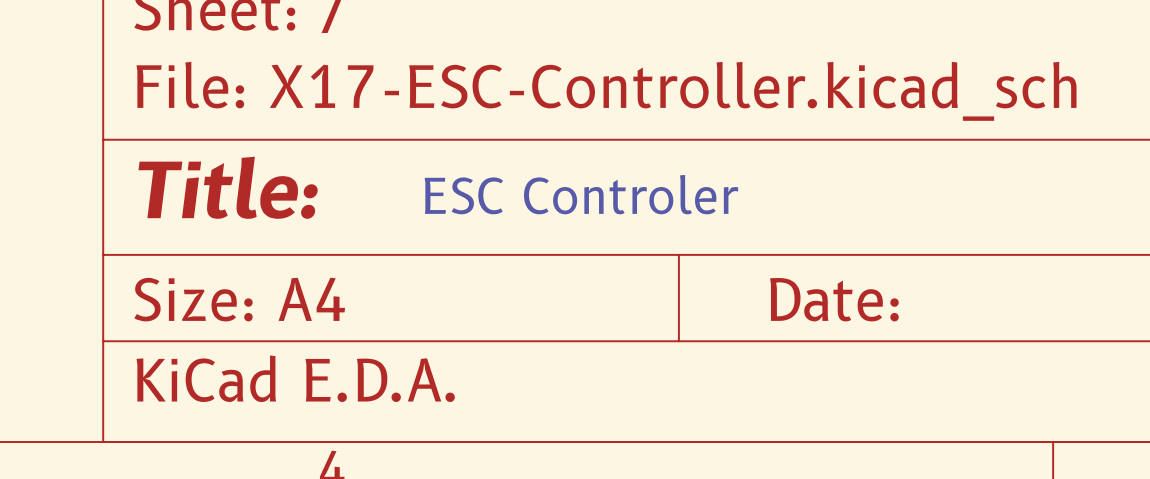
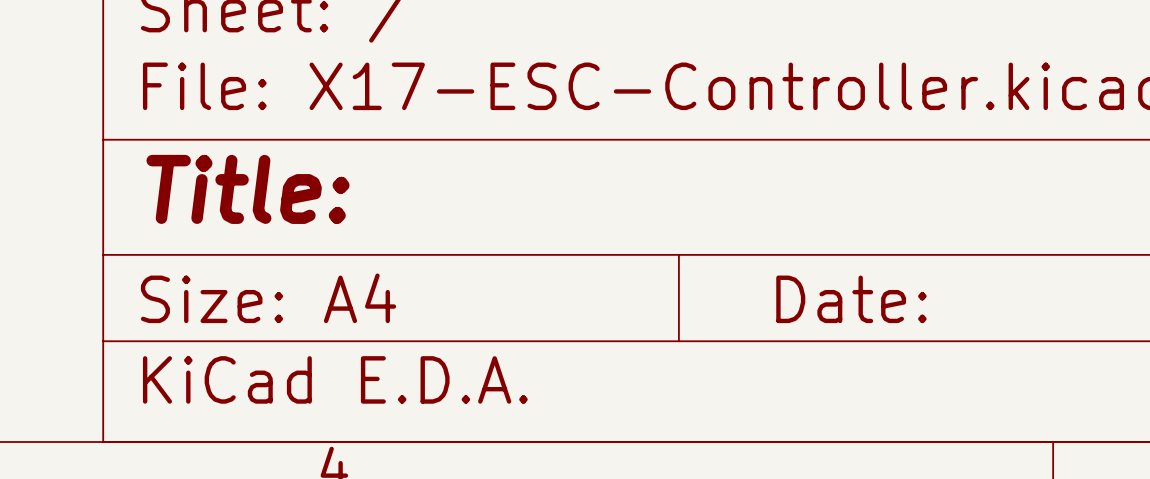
text: ESC Controler (581, 194) -> none

